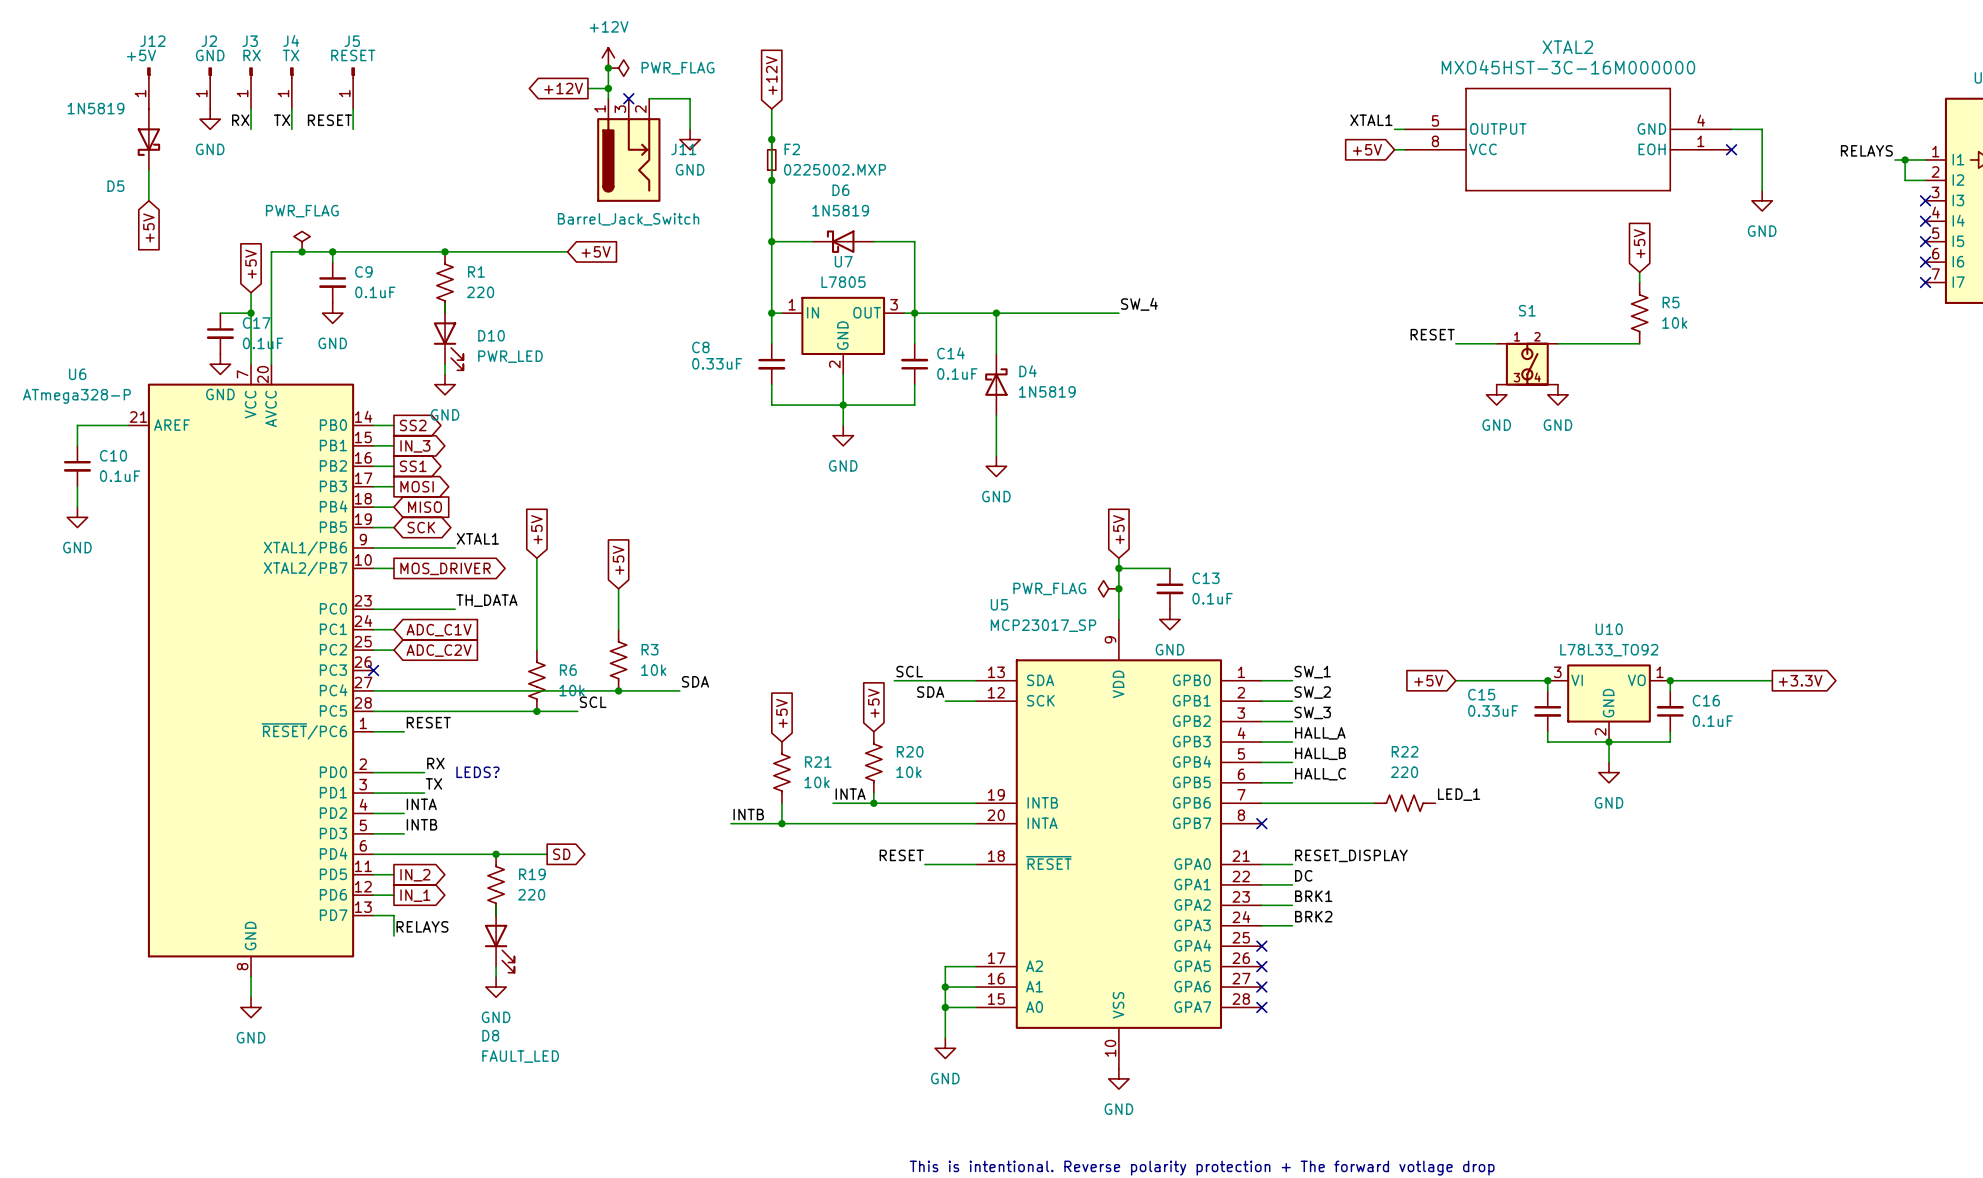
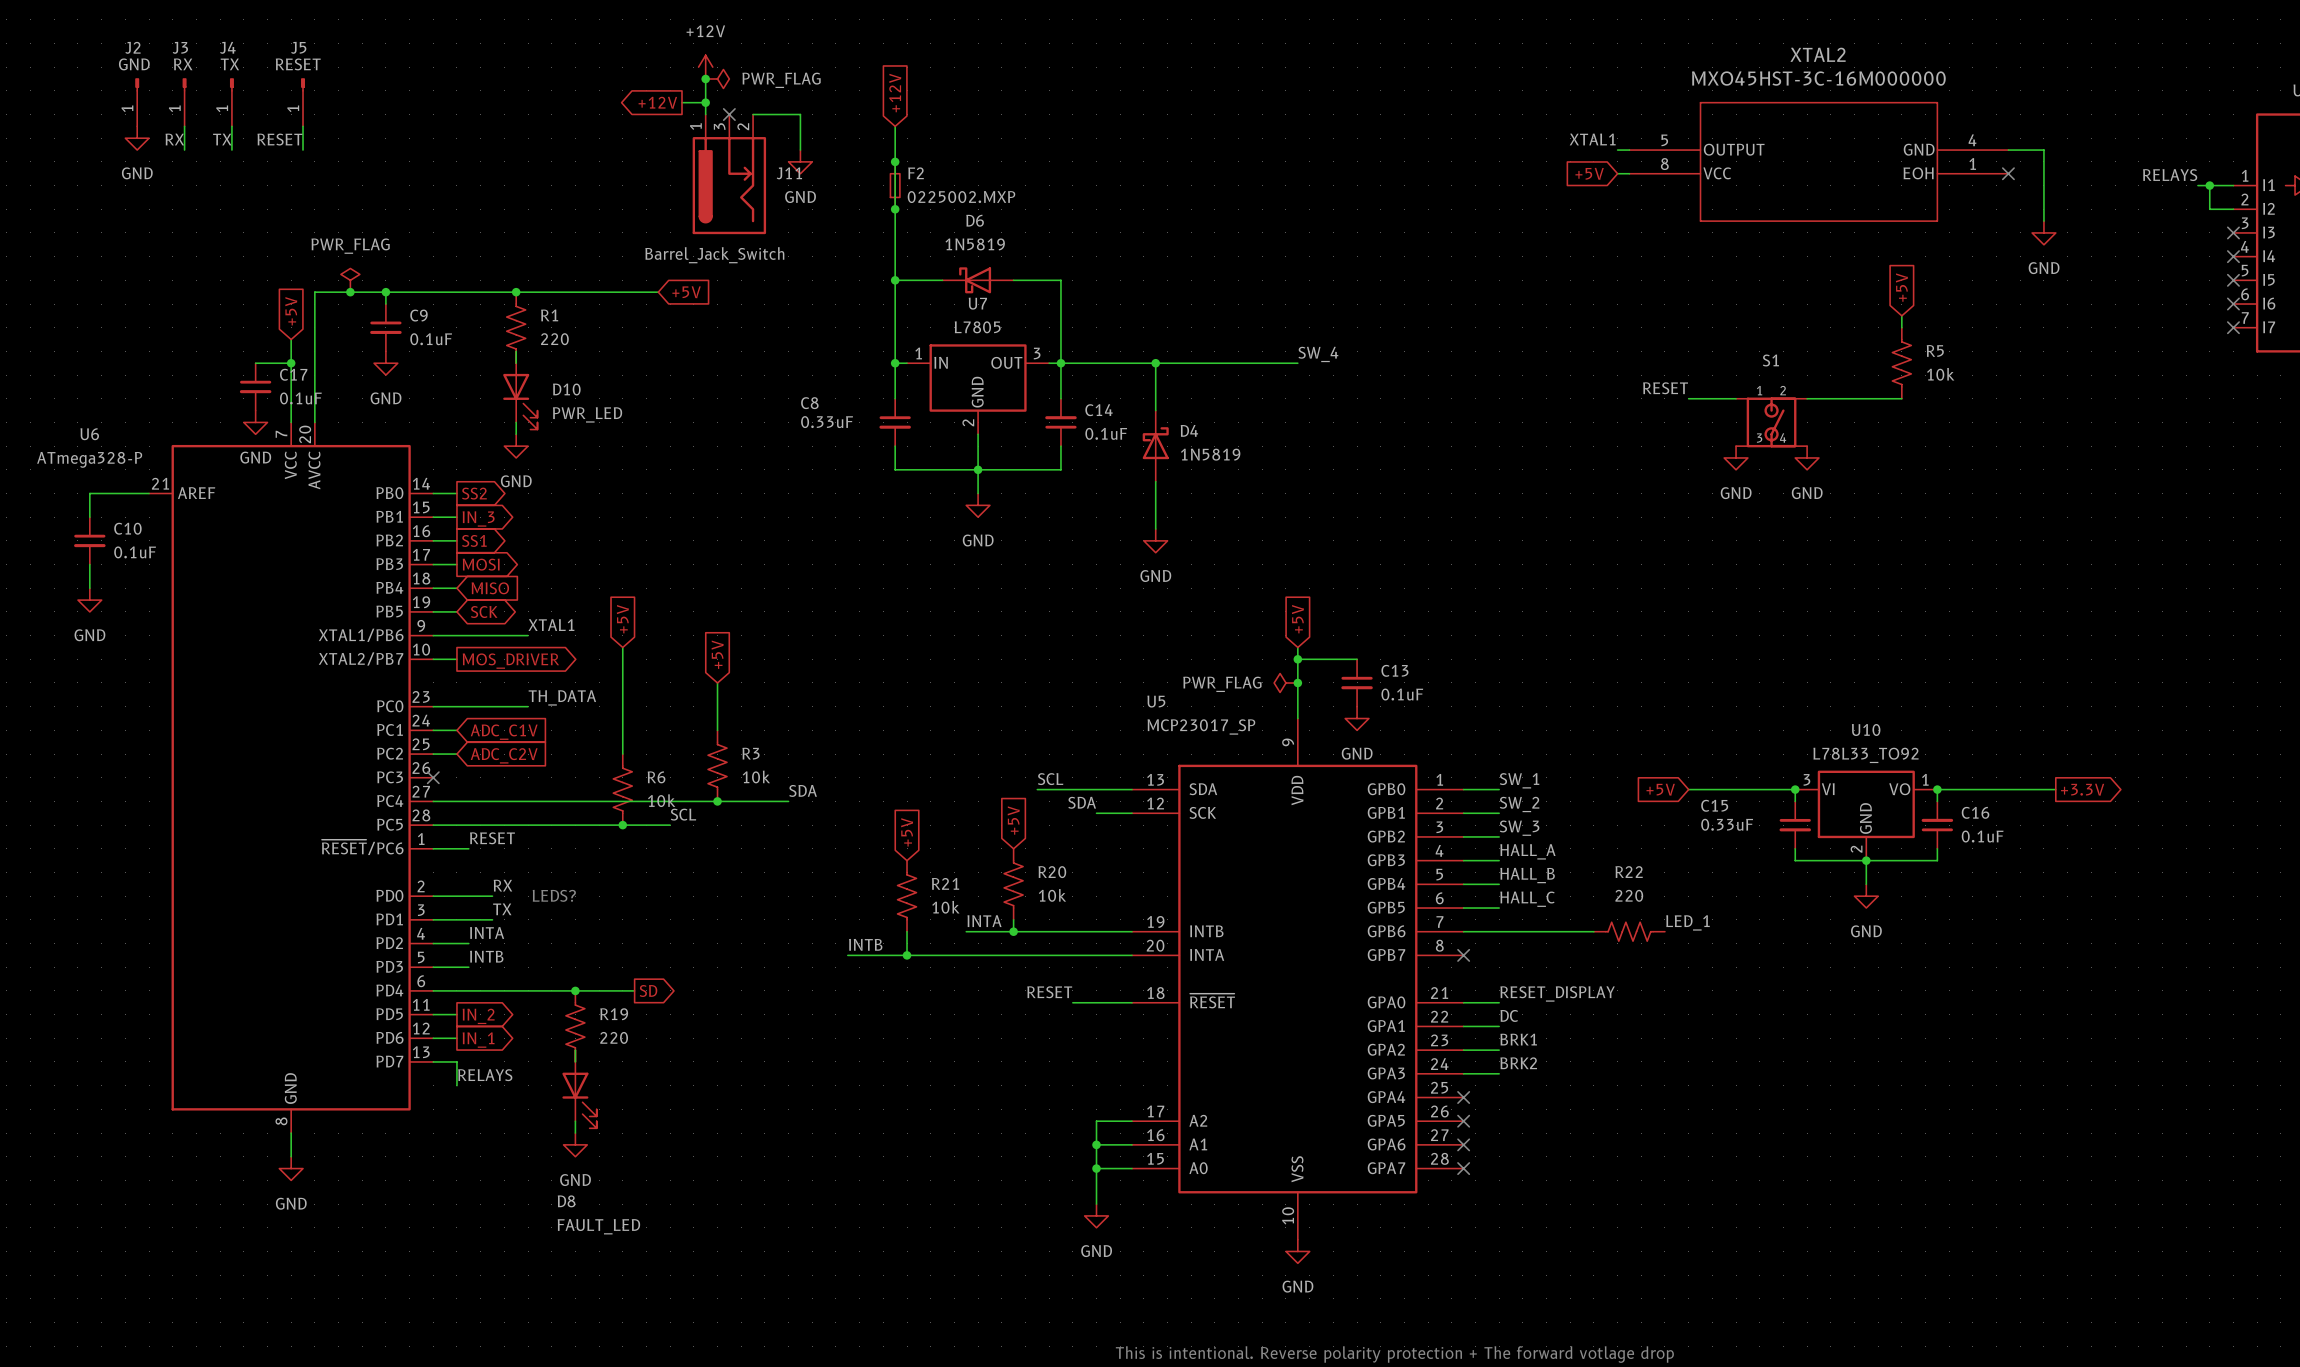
J12: +5V (148, 88) -> none
J2 position: (210, 88) -> (137, 102)
J3 position: (251, 88) -> (184, 102)
J4 position: (291, 88) -> (231, 102)
J5 position: (353, 88) -> (303, 102)
wire: (251, 108) (251, 129) -> (184, 126) (184, 150)
wire: (291, 108) (291, 129) -> (231, 126) (231, 150)
wire: (353, 108) (353, 129) -> (303, 126) (303, 150)
power symbol position: GND (210, 119) -> GND (137, 138)
label position: RX (240, 120) -> RX (174, 139)
label position: TX (282, 120) -> TX (222, 139)
label position: RESET (329, 120) -> RESET (279, 139)
D5: 1N5819 (148, 139) -> none
wire: (148, 170) (148, 200) -> none
global label: +5V (148, 227) -> none

